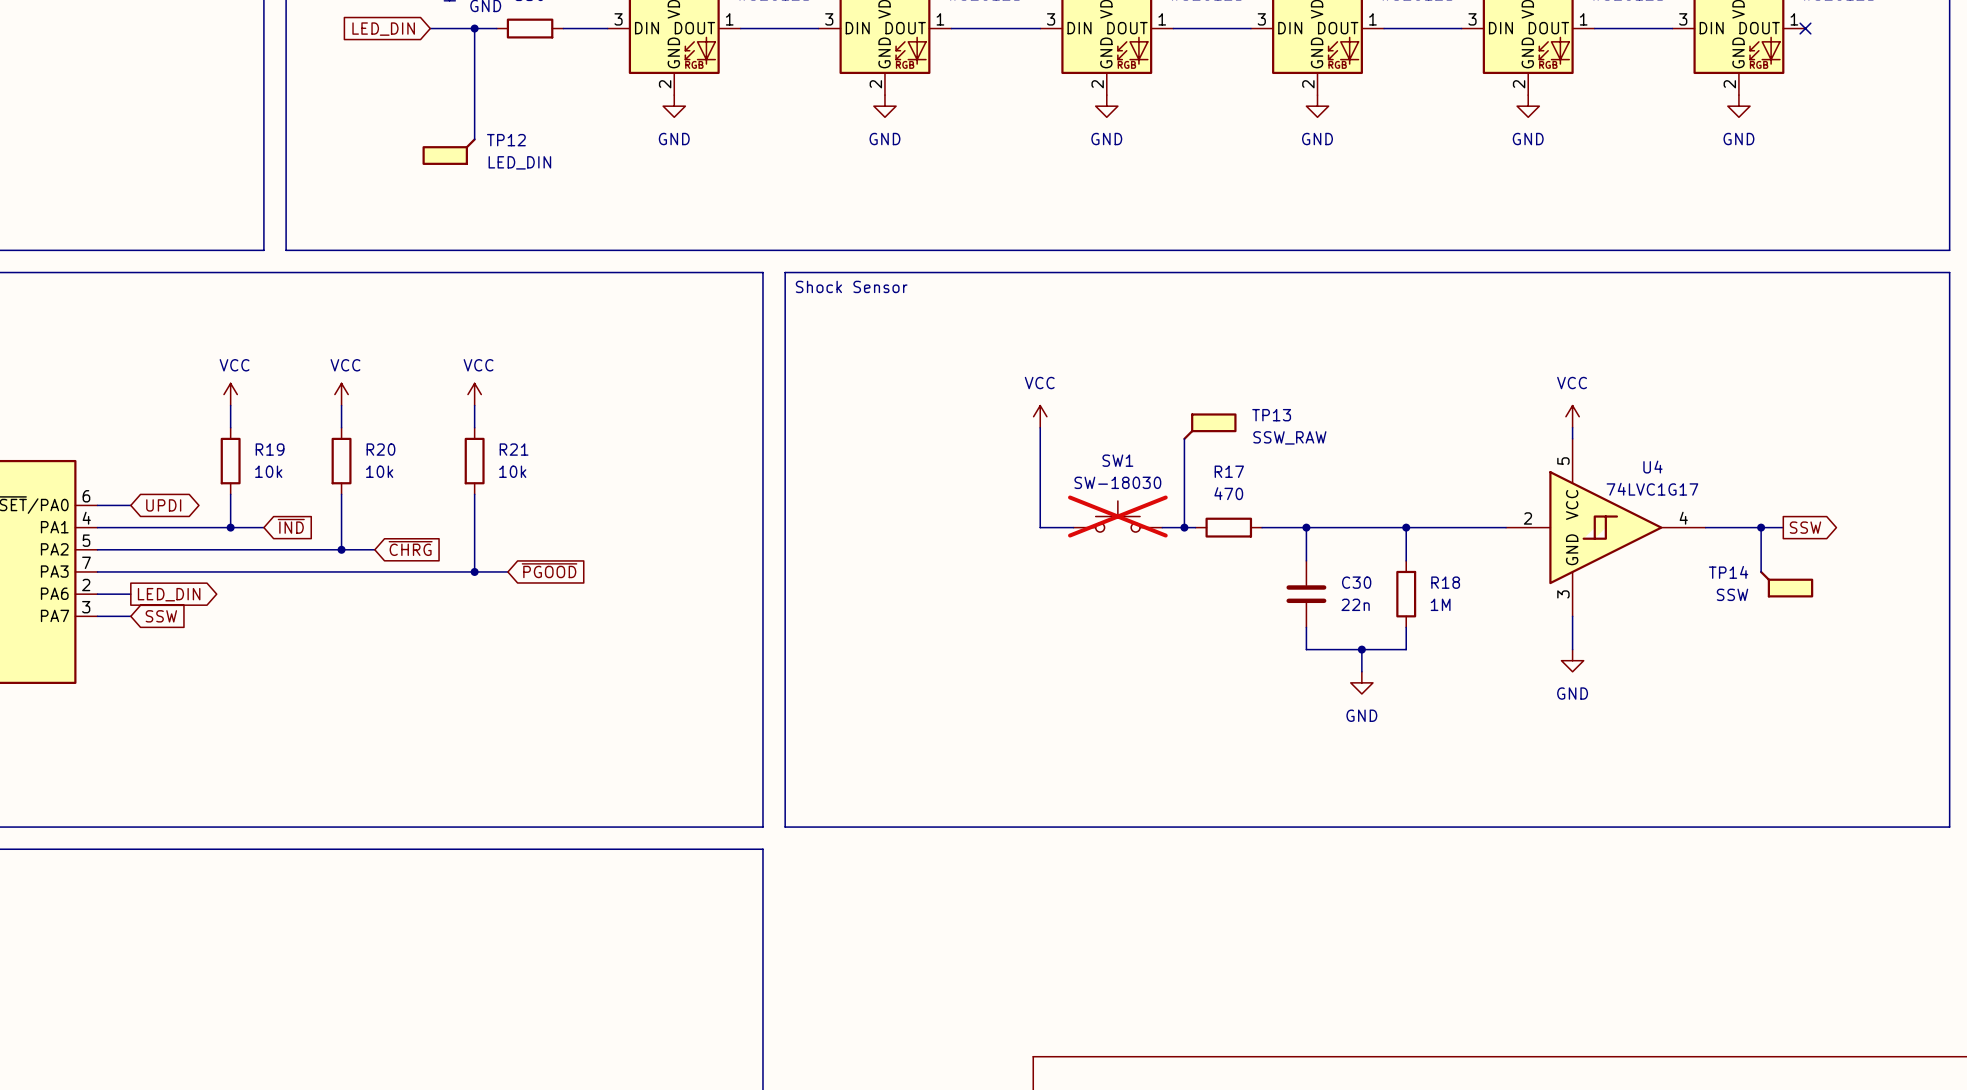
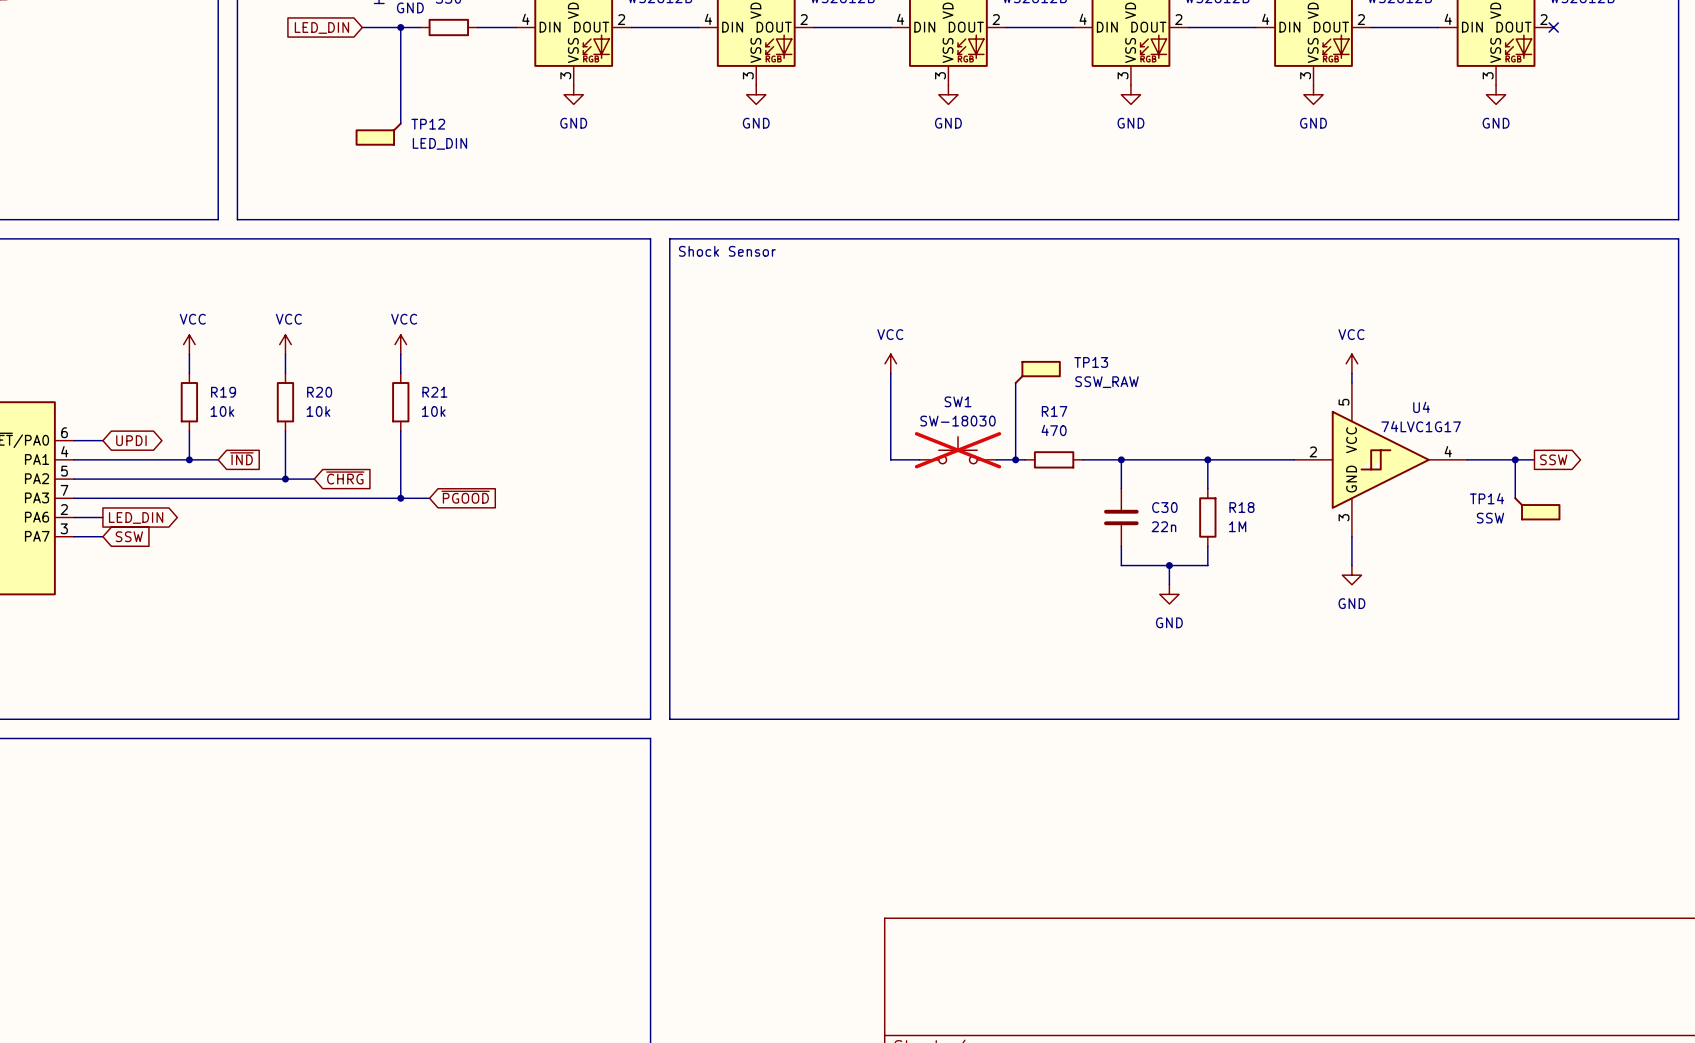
part pin number: 3 (618, 19) -> 4 (525, 19)
part pin number: 1 (729, 19) -> 2 (621, 19)
part pin number: 3 (829, 19) -> 4 (708, 19)
part pin number: 1 (940, 19) -> 2 (804, 19)
part pin number: 3 (1051, 19) -> 4 (900, 19)
part pin number: 1 (1162, 19) -> 2 (996, 19)
part pin number: 3 (1261, 19) -> 4 (1083, 19)
part pin number: 1 (1372, 19) -> 2 (1178, 19)
part pin number: 3 (1472, 19) -> 4 (1265, 19)
part pin number: 1 (1583, 19) -> 2 (1361, 19)
part pin number: 3 (1683, 19) -> 4 (1448, 19)
part pin number: 1 (1794, 19) -> 2 (1543, 19)
part pin name: GND (673, 52) -> VSS (573, 50)
part pin name: GND (884, 52) -> VSS (755, 50)
part pin name: GND (1106, 52) -> VSS (948, 50)
part pin name: GND (1317, 52) -> VSS (1130, 50)
part pin name: GND (1527, 52) -> VSS (1313, 50)
part pin name: GND (1738, 52) -> VSS (1495, 50)
part pin number: 2 (665, 84) -> 3 (565, 75)
part pin number: 2 (875, 84) -> 3 (748, 75)
part pin number: 2 (1097, 84) -> 3 (940, 75)
part pin number: 2 (1308, 84) -> 3 (1123, 75)
part pin number: 2 (1519, 84) -> 3 (1305, 75)
part pin number: 2 (1729, 84) -> 3 (1488, 75)

